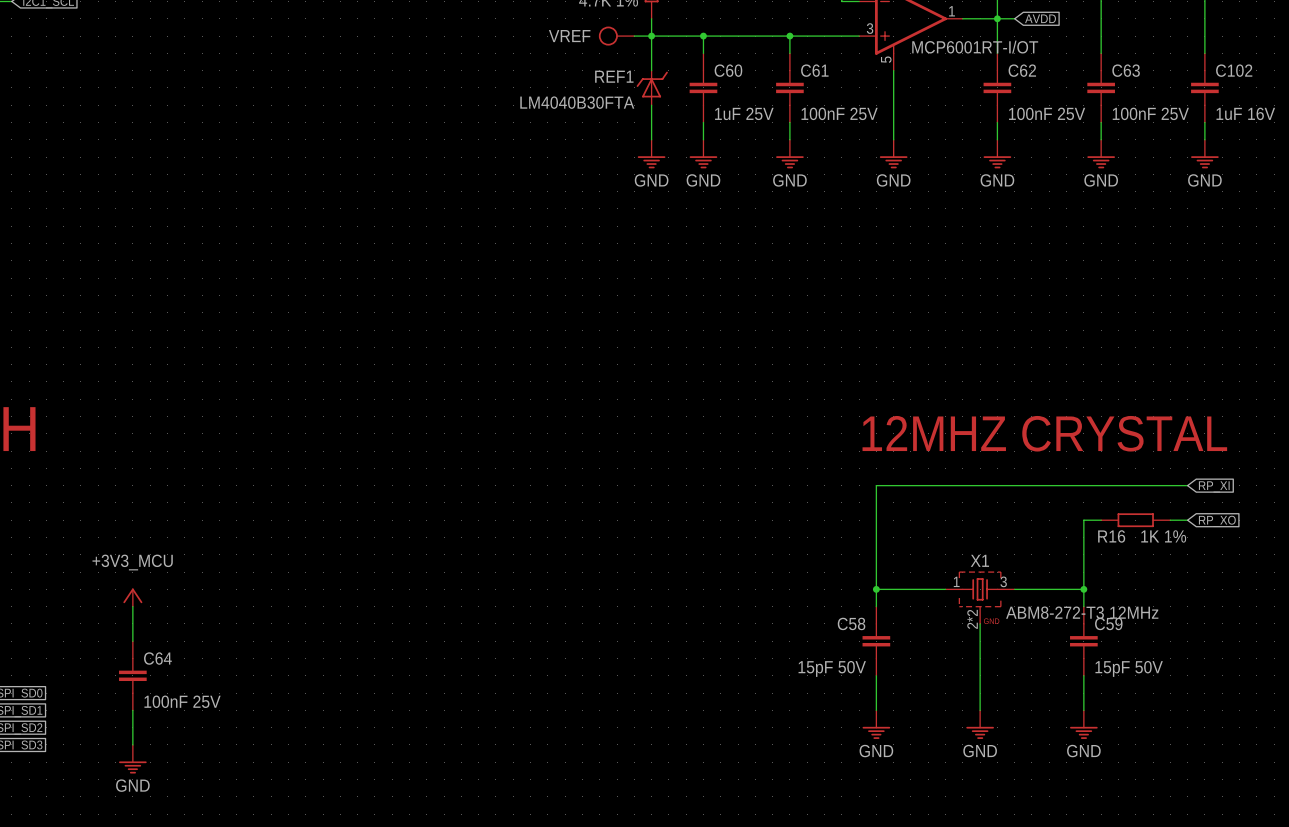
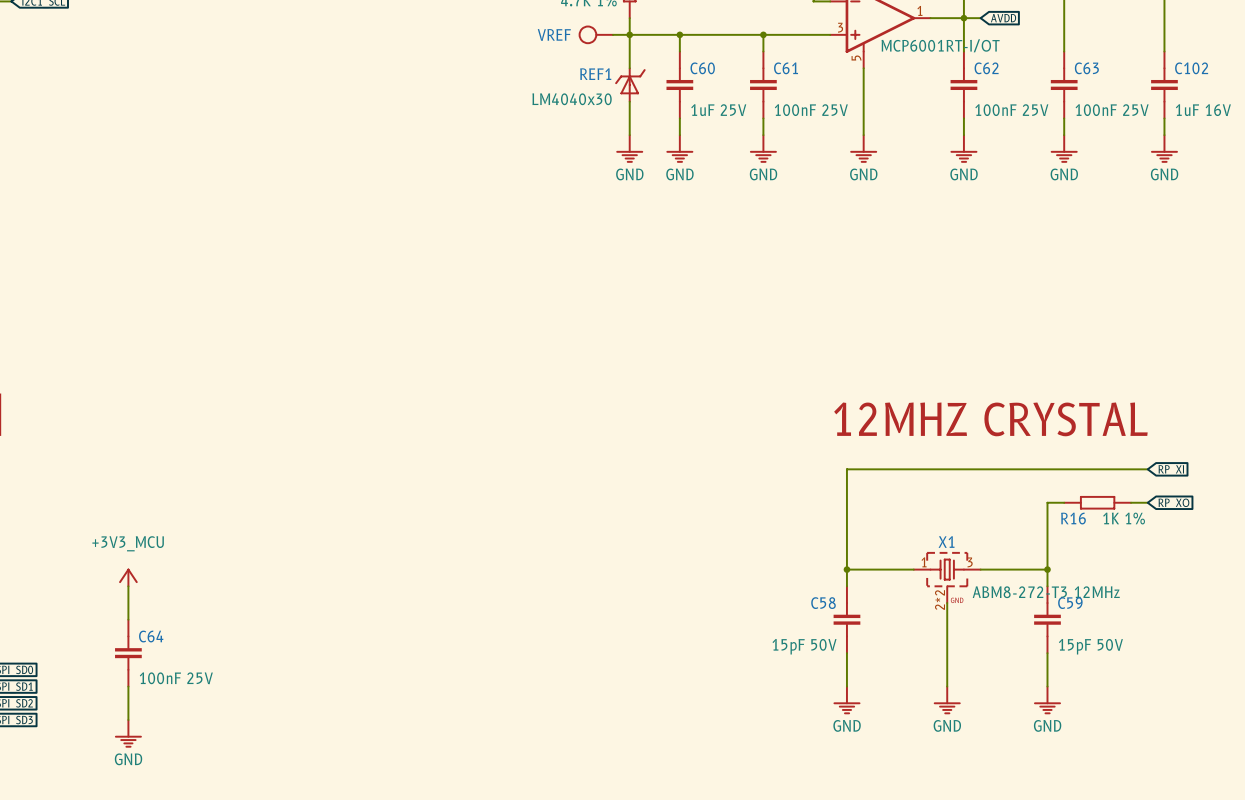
REF1 value: LM4040B30FTA (577, 102) -> LM4040x30 (572, 99)

